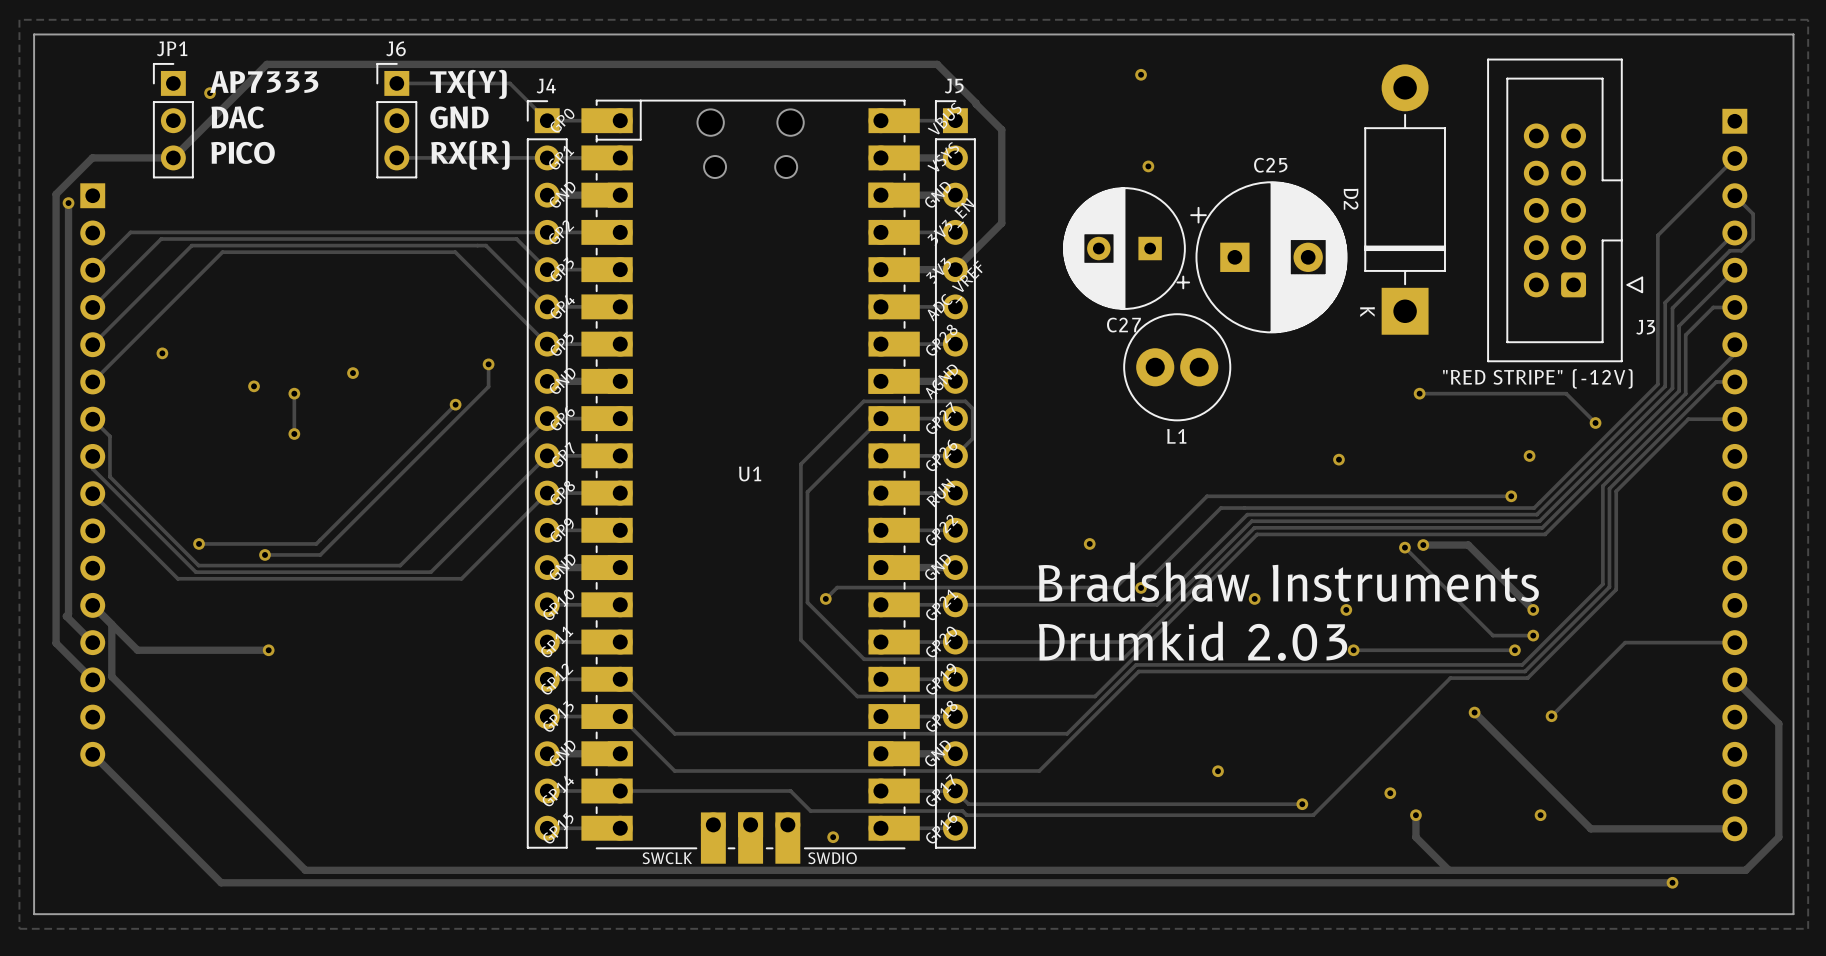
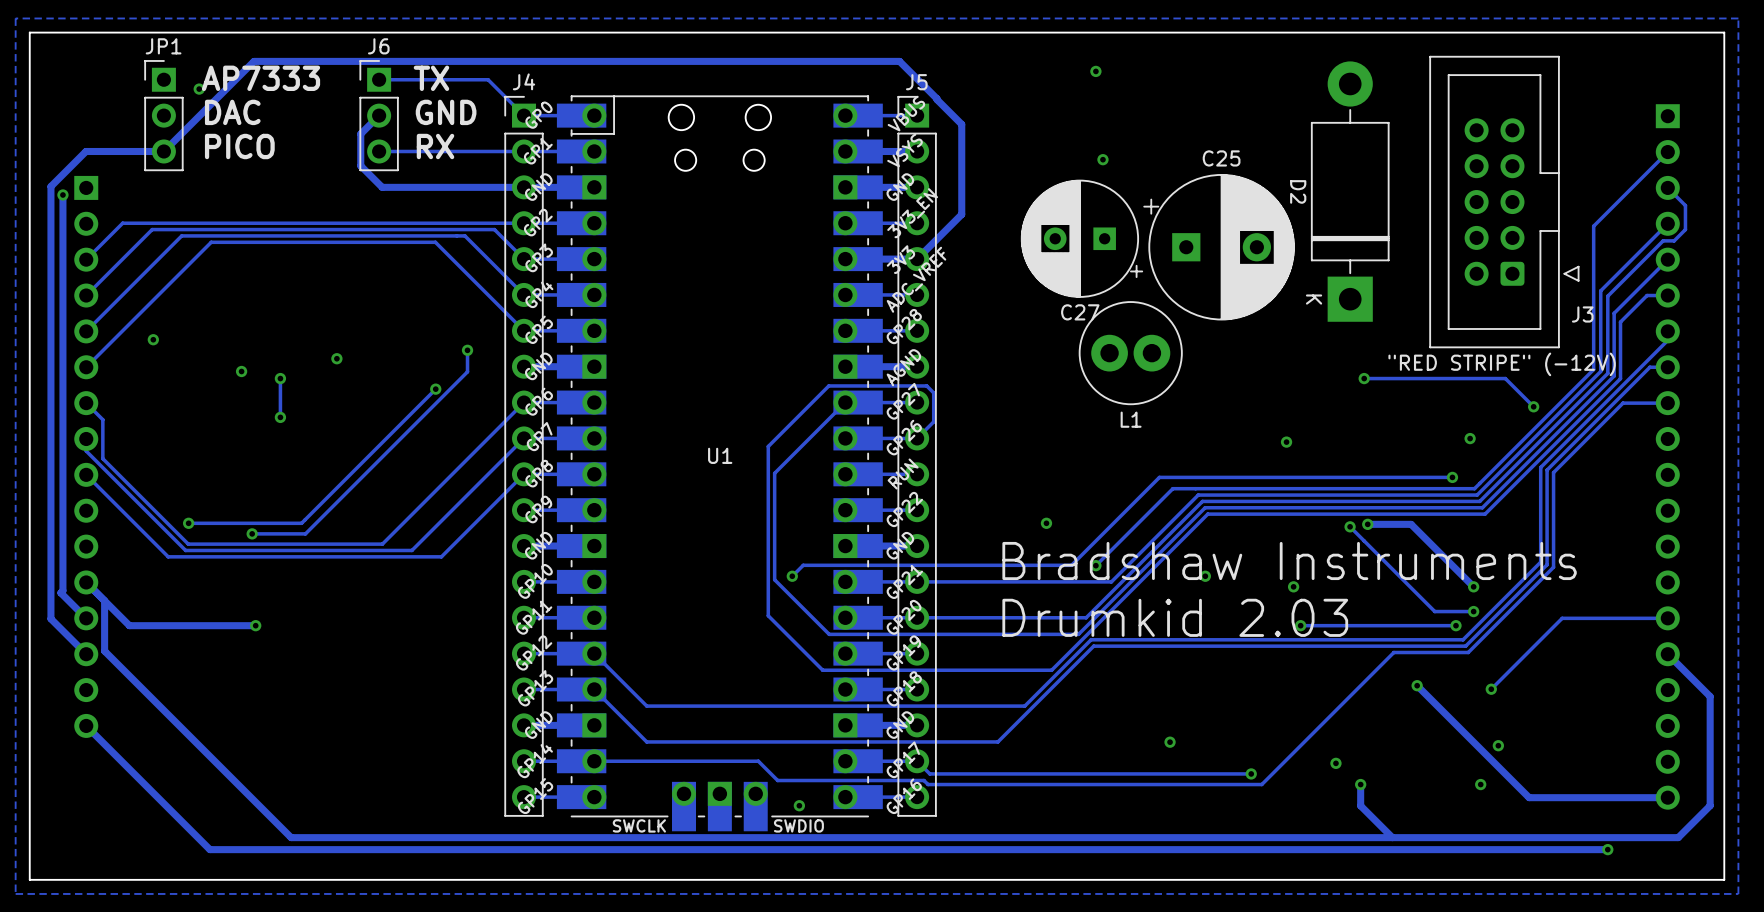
text: TX(Y) (468, 84) -> TX (431, 78)
track: none -> (379, 115) (360, 133) (360, 165) (382, 187) (524, 187)
text: RX(R) (470, 155) -> RX (435, 146)
via: none -> (1498, 745)

